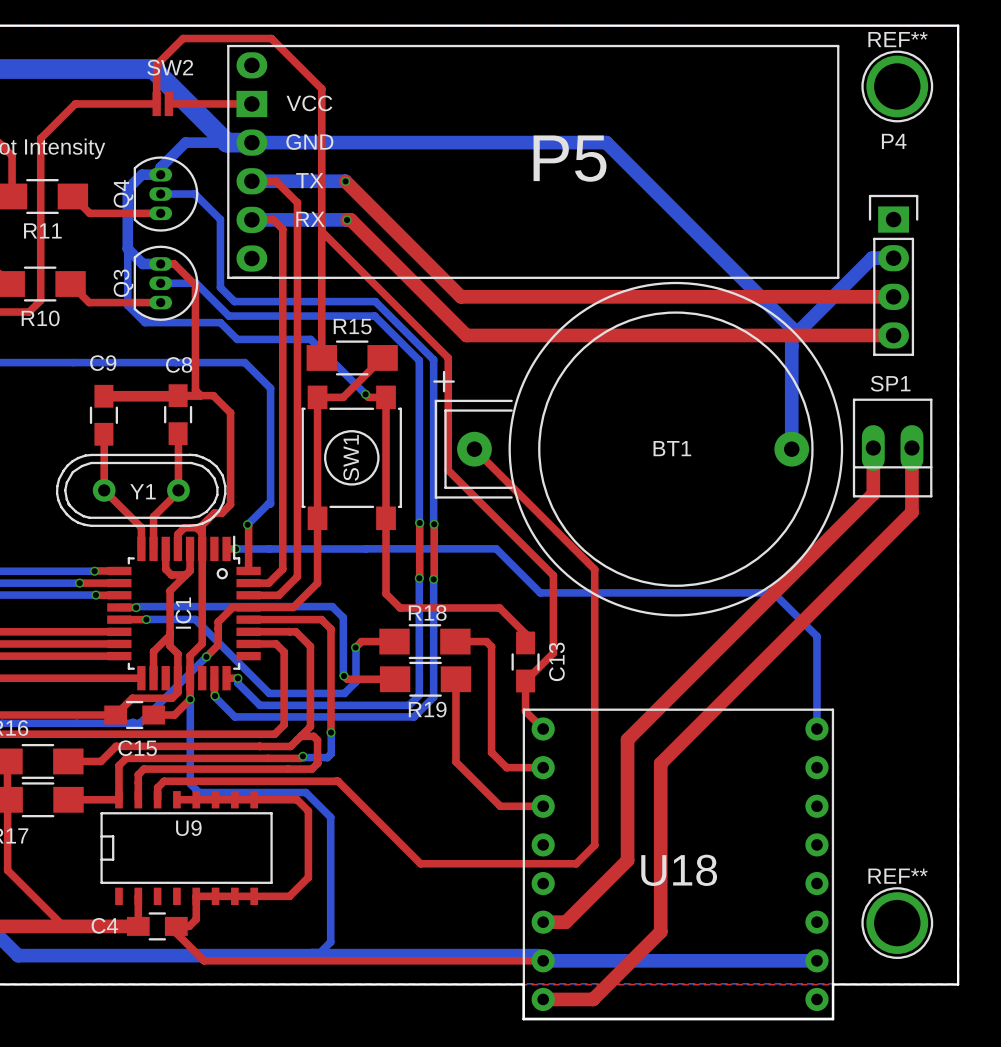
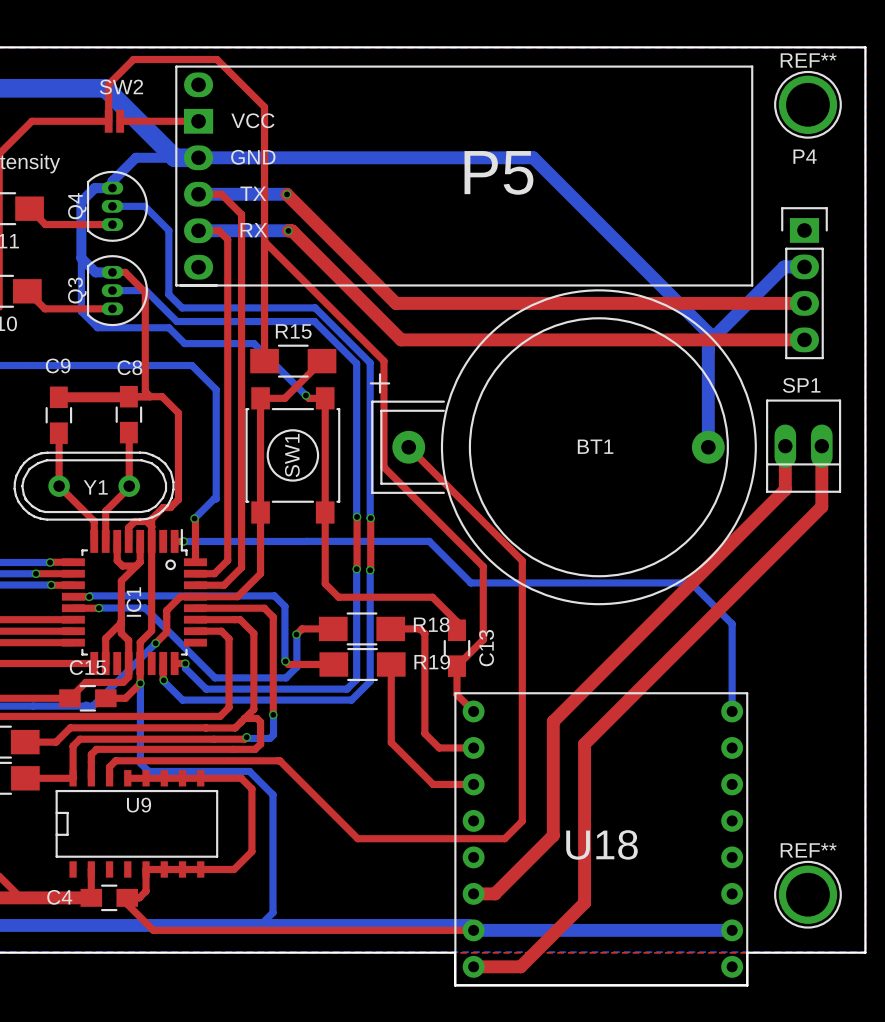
R18 name position: R18 (427, 613) -> R18 (431, 624)
R19 name position: R19 (427, 709) -> R19 (432, 662)
C15 name position: C15 (137, 748) -> C15 (87, 667)

